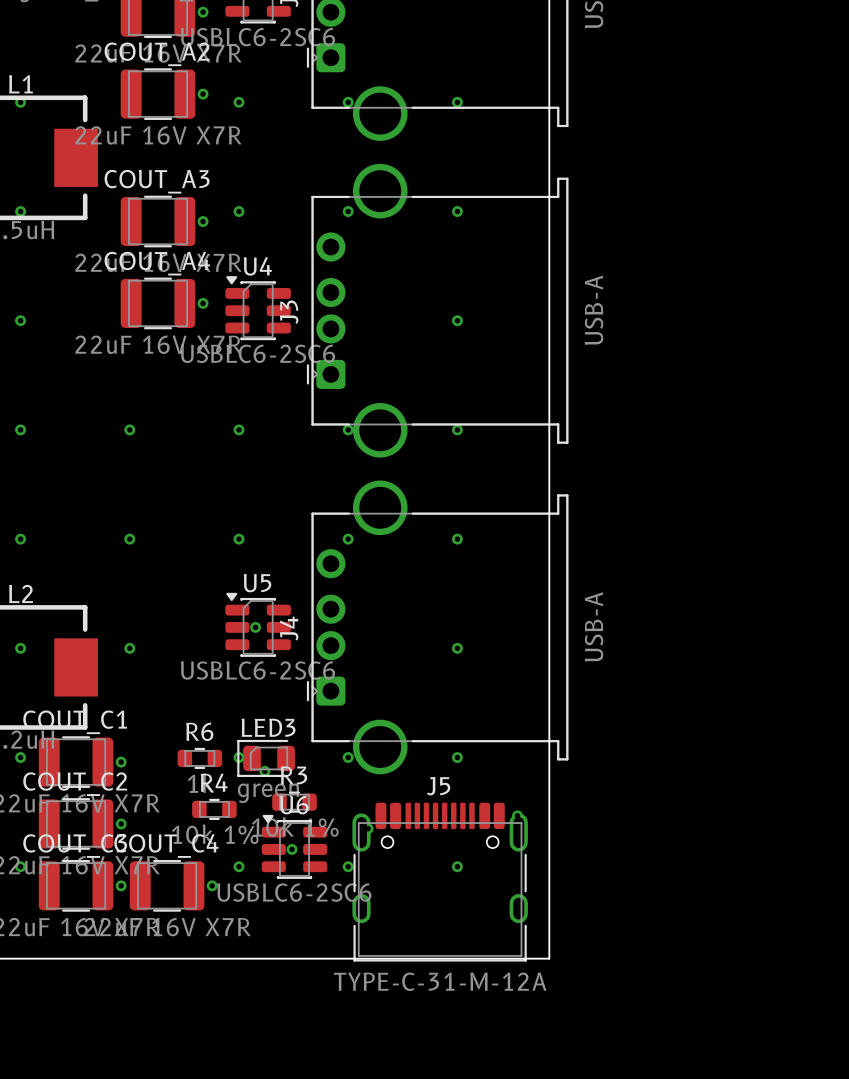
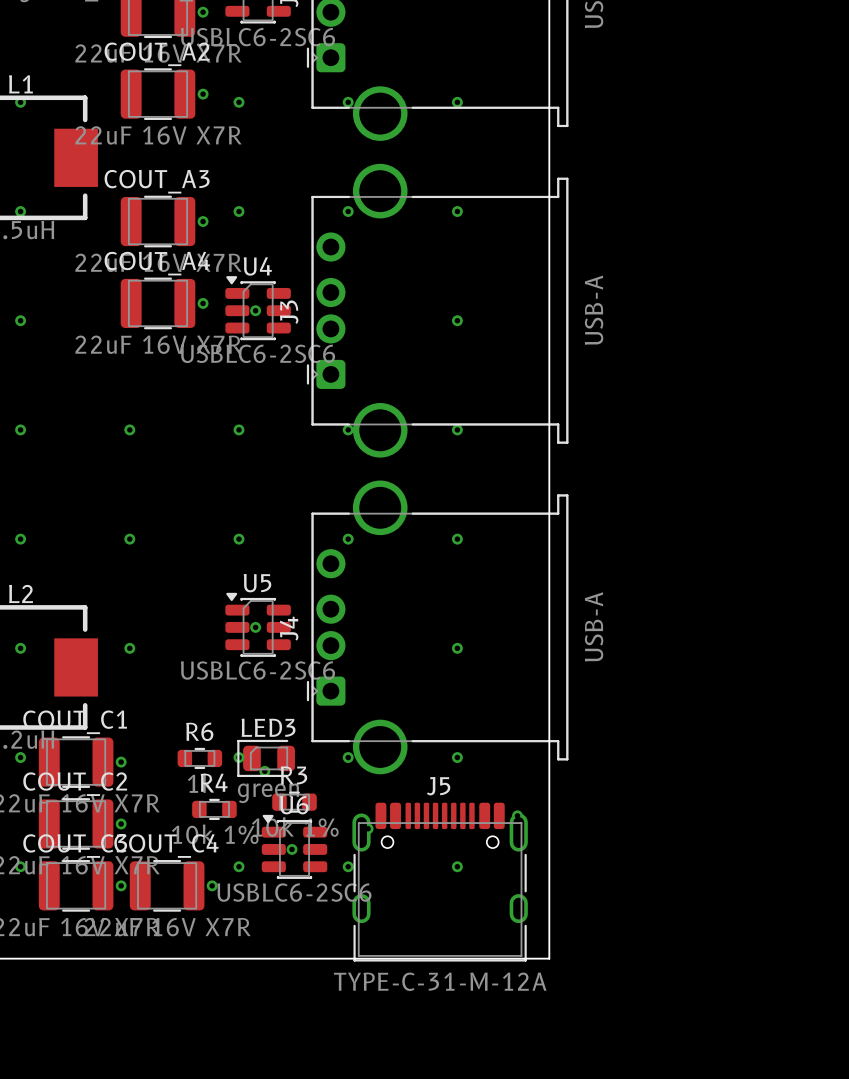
via: none -> (255, 310)

